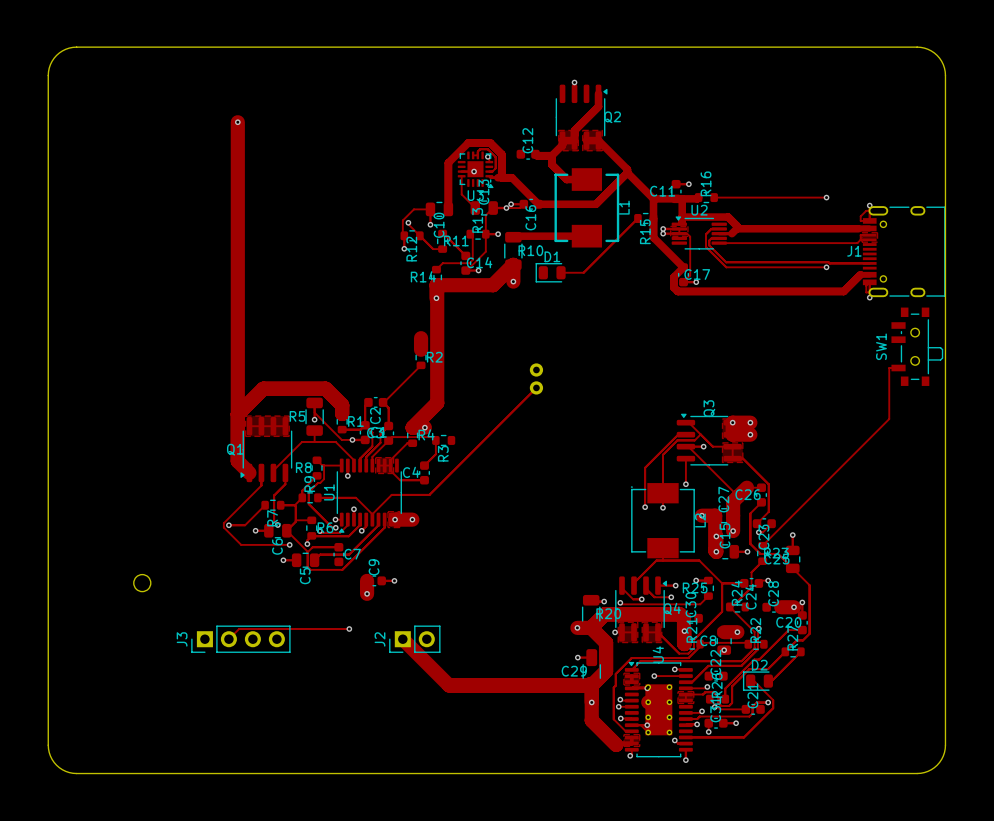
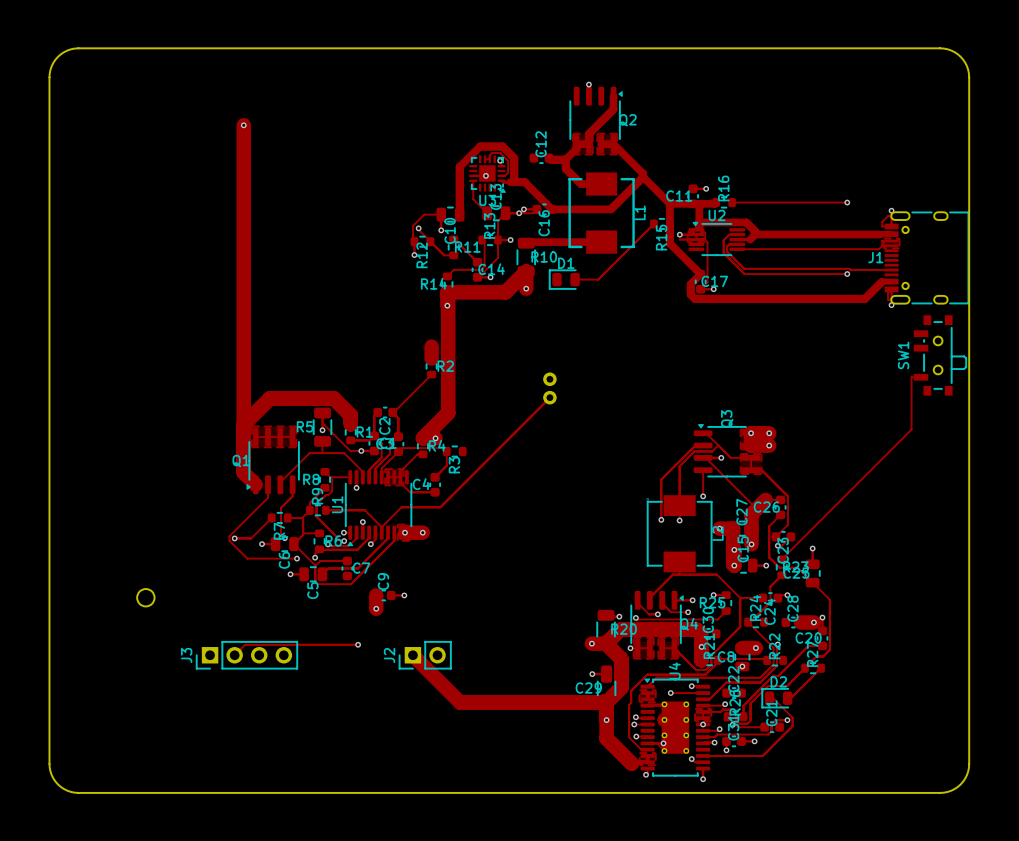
via: (663, 233) -> none
via position: (647, 688) -> (703, 724)

